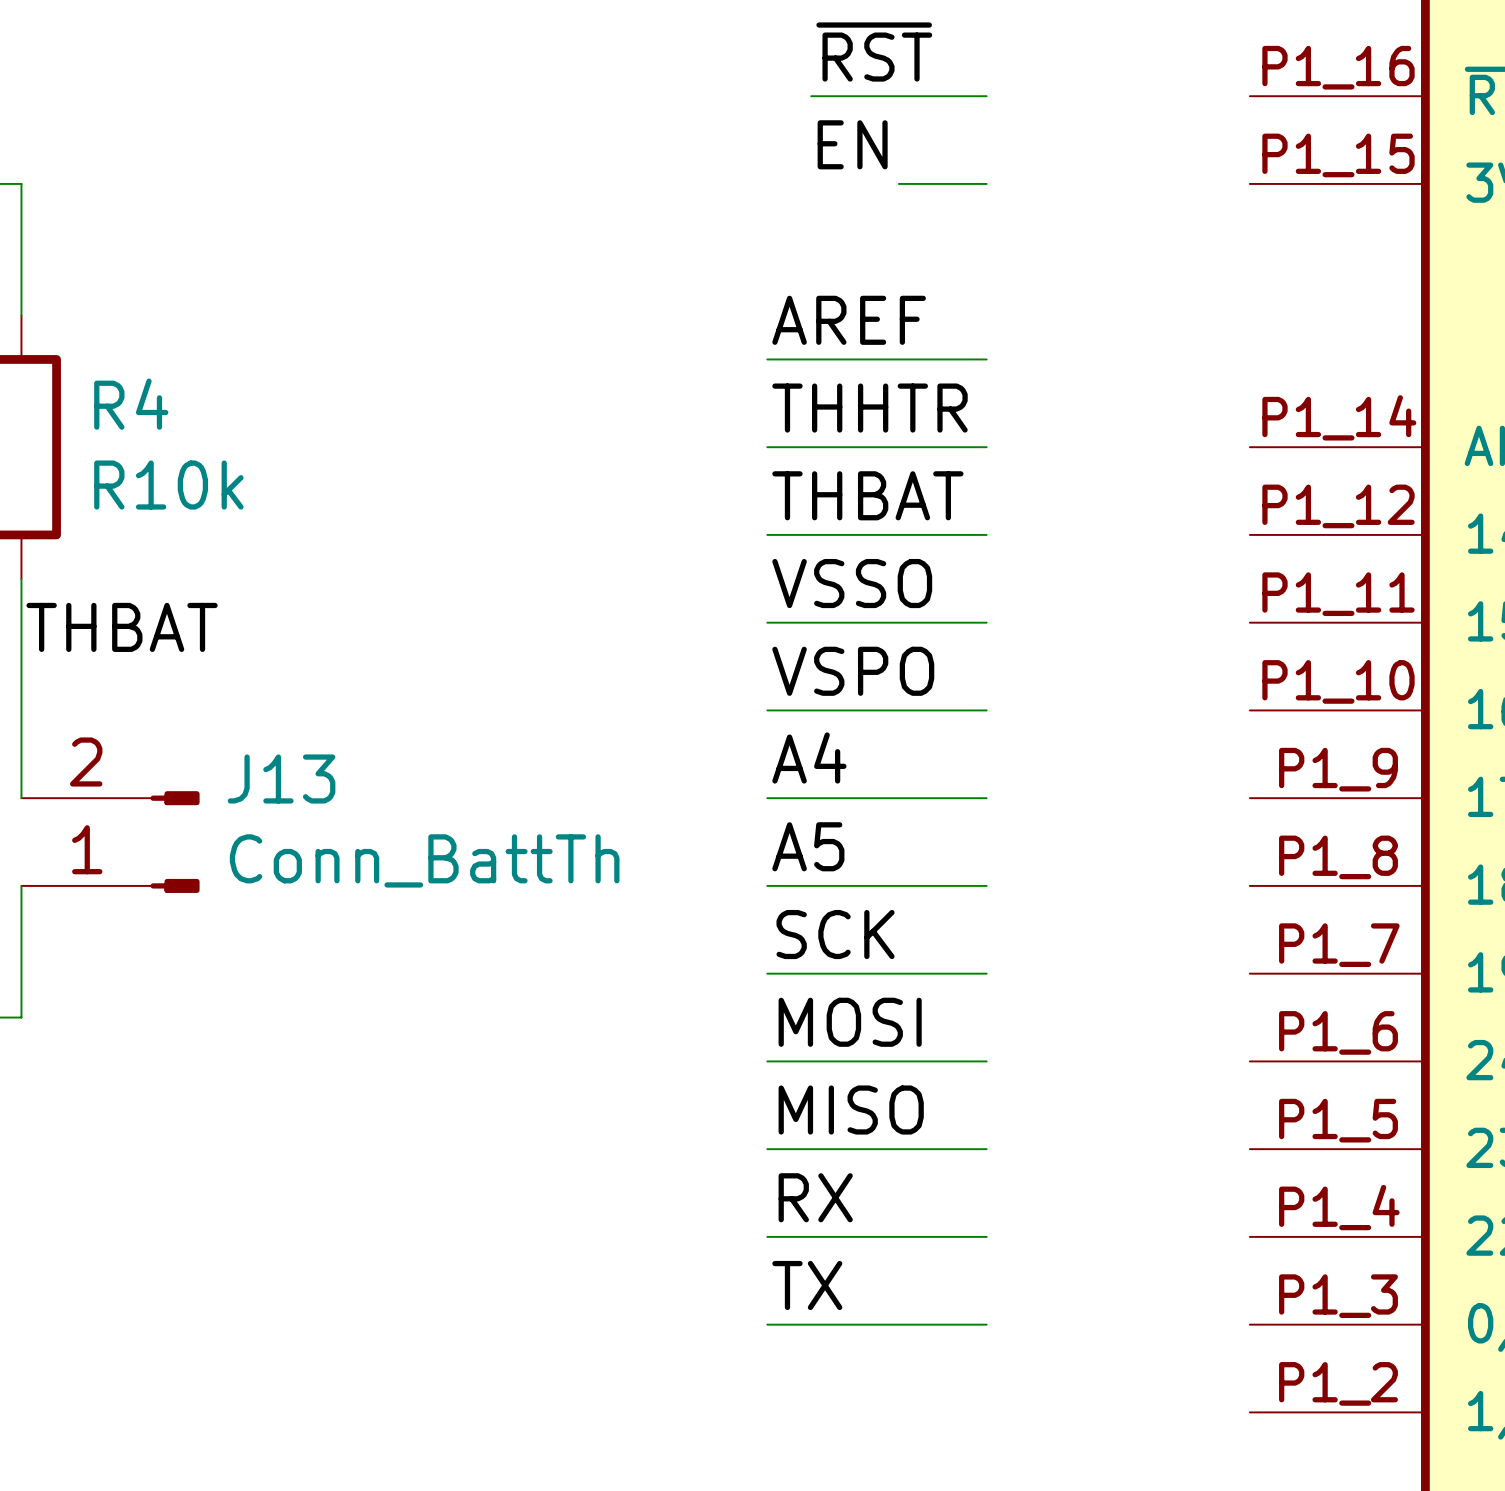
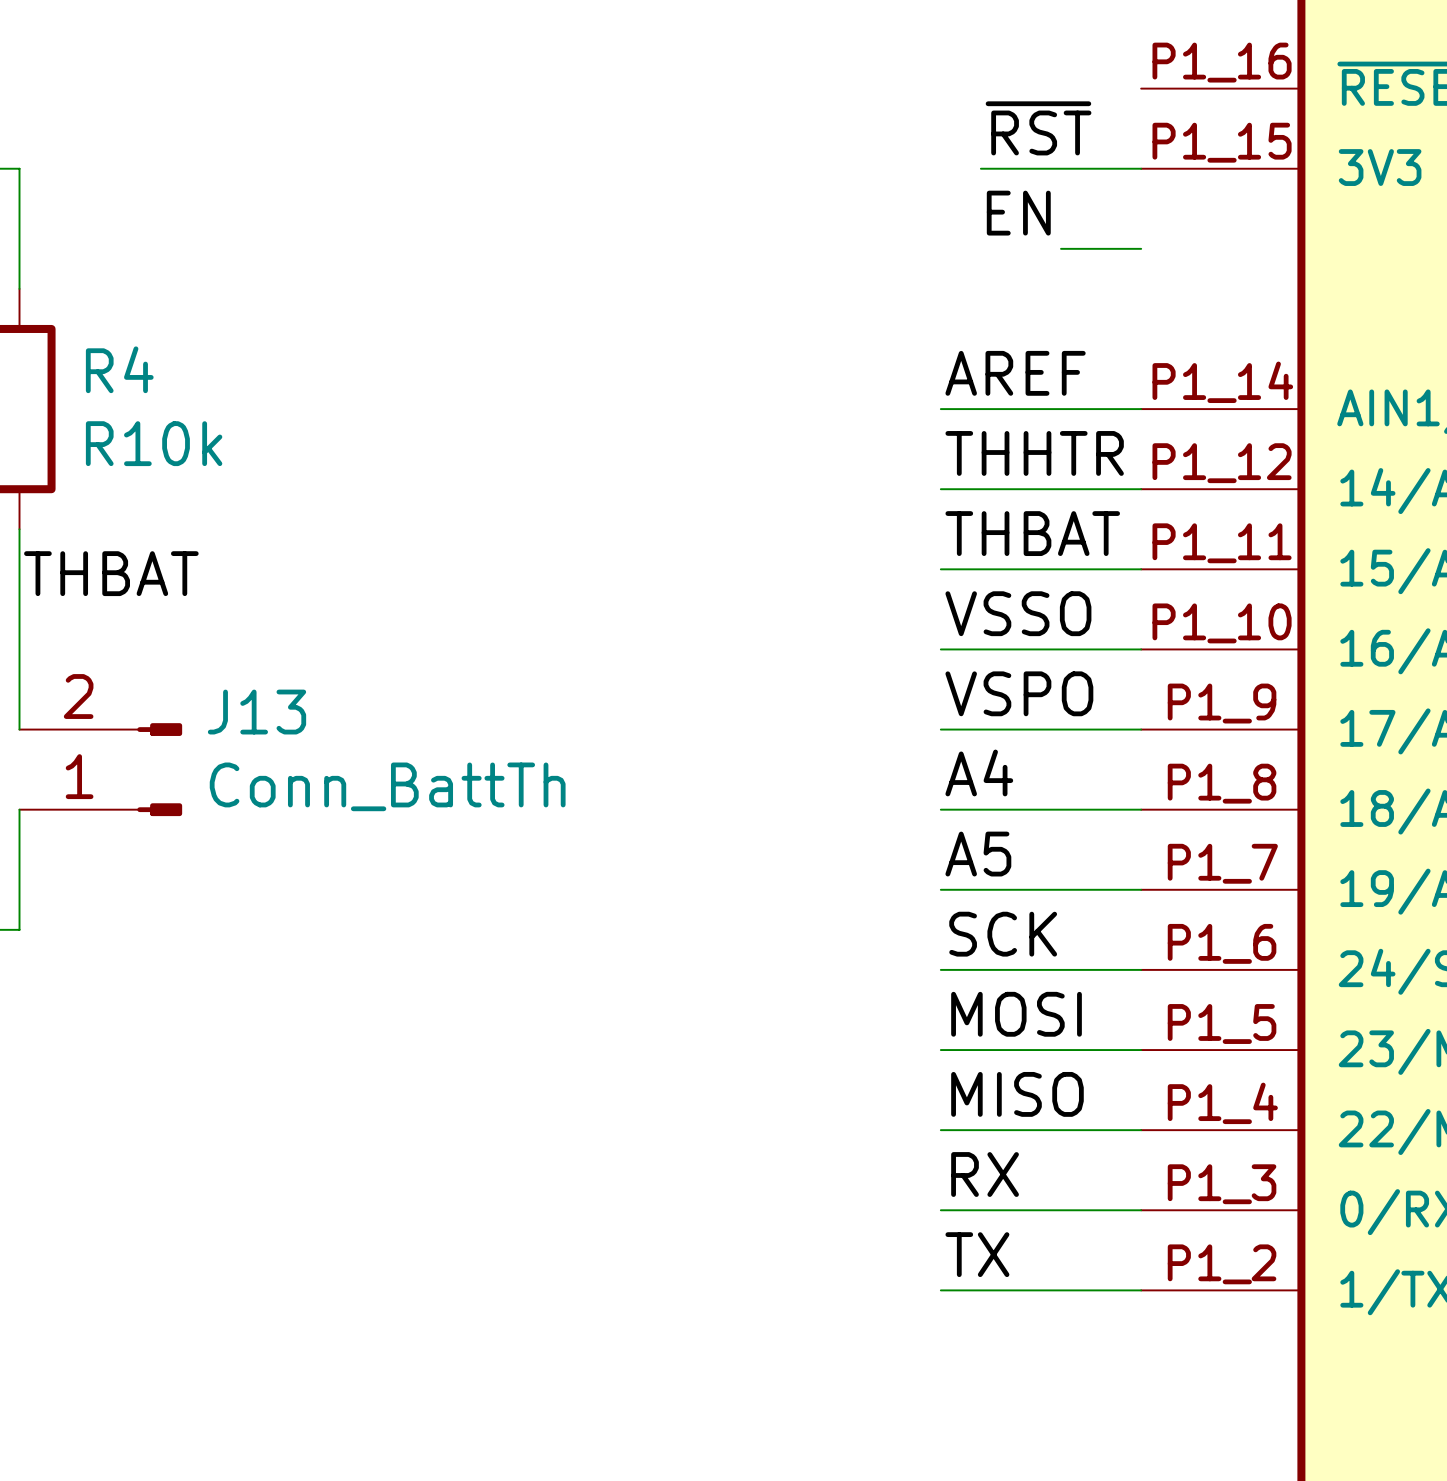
label position: ~{RST} (874, 52) -> ~{RST} (1038, 128)
wire: (811, 96) (986, 96) -> (980, 168) (1141, 168)
label position: EN (852, 144) -> EN (1018, 213)
wire: (898, 183) (986, 183) -> (1061, 248) (1141, 248)
label position: AREF (849, 320) -> AREF (1015, 373)
wire: (767, 359) (986, 359) -> (940, 409) (1141, 409)
label position: THHTR (870, 408) -> THHTR (1034, 453)
wire: (767, 447) (986, 447) -> (940, 489) (1141, 489)
label position: THBAT (867, 495) -> THBAT (1032, 533)
wire: (767, 534) (986, 534) -> (940, 569) (1141, 569)
label position: VSSO (852, 583) -> VSSO (1018, 613)
wire: (767, 622) (986, 622) -> (940, 649) (1141, 649)
label position: VSPO (853, 671) -> VSPO (1019, 693)
wire: (767, 710) (986, 710) -> (940, 729) (1141, 729)
label position: A4 (809, 757) -> A4 (979, 772)
wire: (767, 798) (986, 798) -> (940, 809) (1141, 809)
label position: A5 (808, 846) -> A5 (978, 854)
wire: (767, 885) (986, 885) -> (940, 889) (1141, 889)
label position: SCK (835, 934) -> SCK (1003, 934)
wire: (767, 973) (986, 973) -> (940, 969) (1141, 969)
label position: MOSI (850, 1022) -> MOSI (1016, 1014)
wire: (767, 1061) (986, 1061) -> (940, 1050) (1141, 1050)
label position: MISO (851, 1110) -> MISO (1017, 1094)
wire: (767, 1149) (986, 1149) -> (940, 1130) (1141, 1130)
label position: RX (815, 1197) -> RX (985, 1174)
wire: (767, 1236) (986, 1236) -> (940, 1210) (1141, 1210)
label position: TX (807, 1285) -> TX (977, 1254)
wire: (767, 1324) (986, 1324) -> (940, 1290) (1141, 1290)

